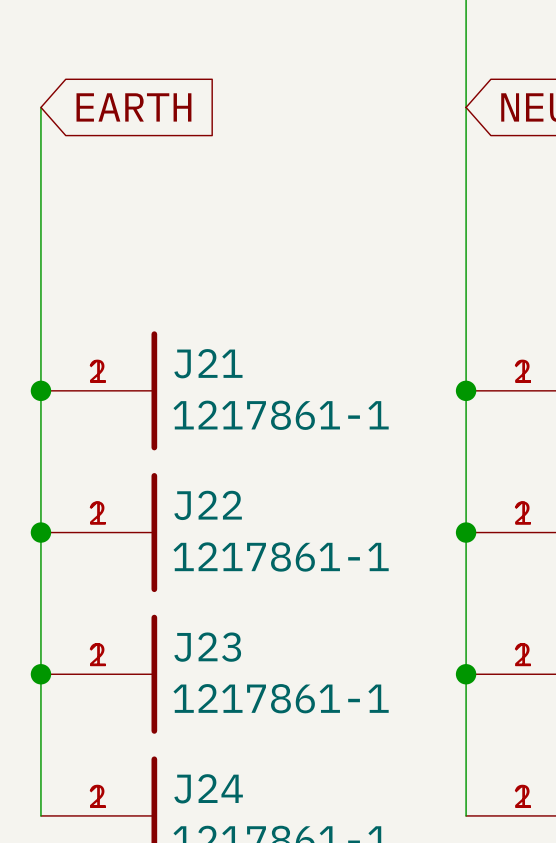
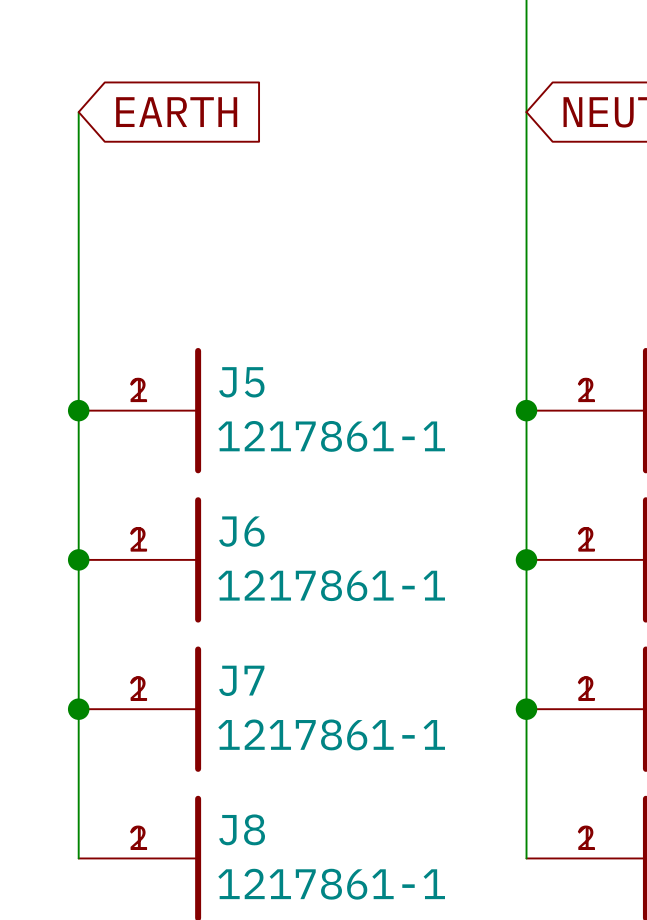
J21 name: J21 (208, 363) -> J5 (241, 382)
J22 name: J22 (208, 505) -> J6 (241, 531)
J23 name: J23 (207, 647) -> J7 (241, 680)
J24 name: J24 (208, 788) -> J8 (242, 829)

